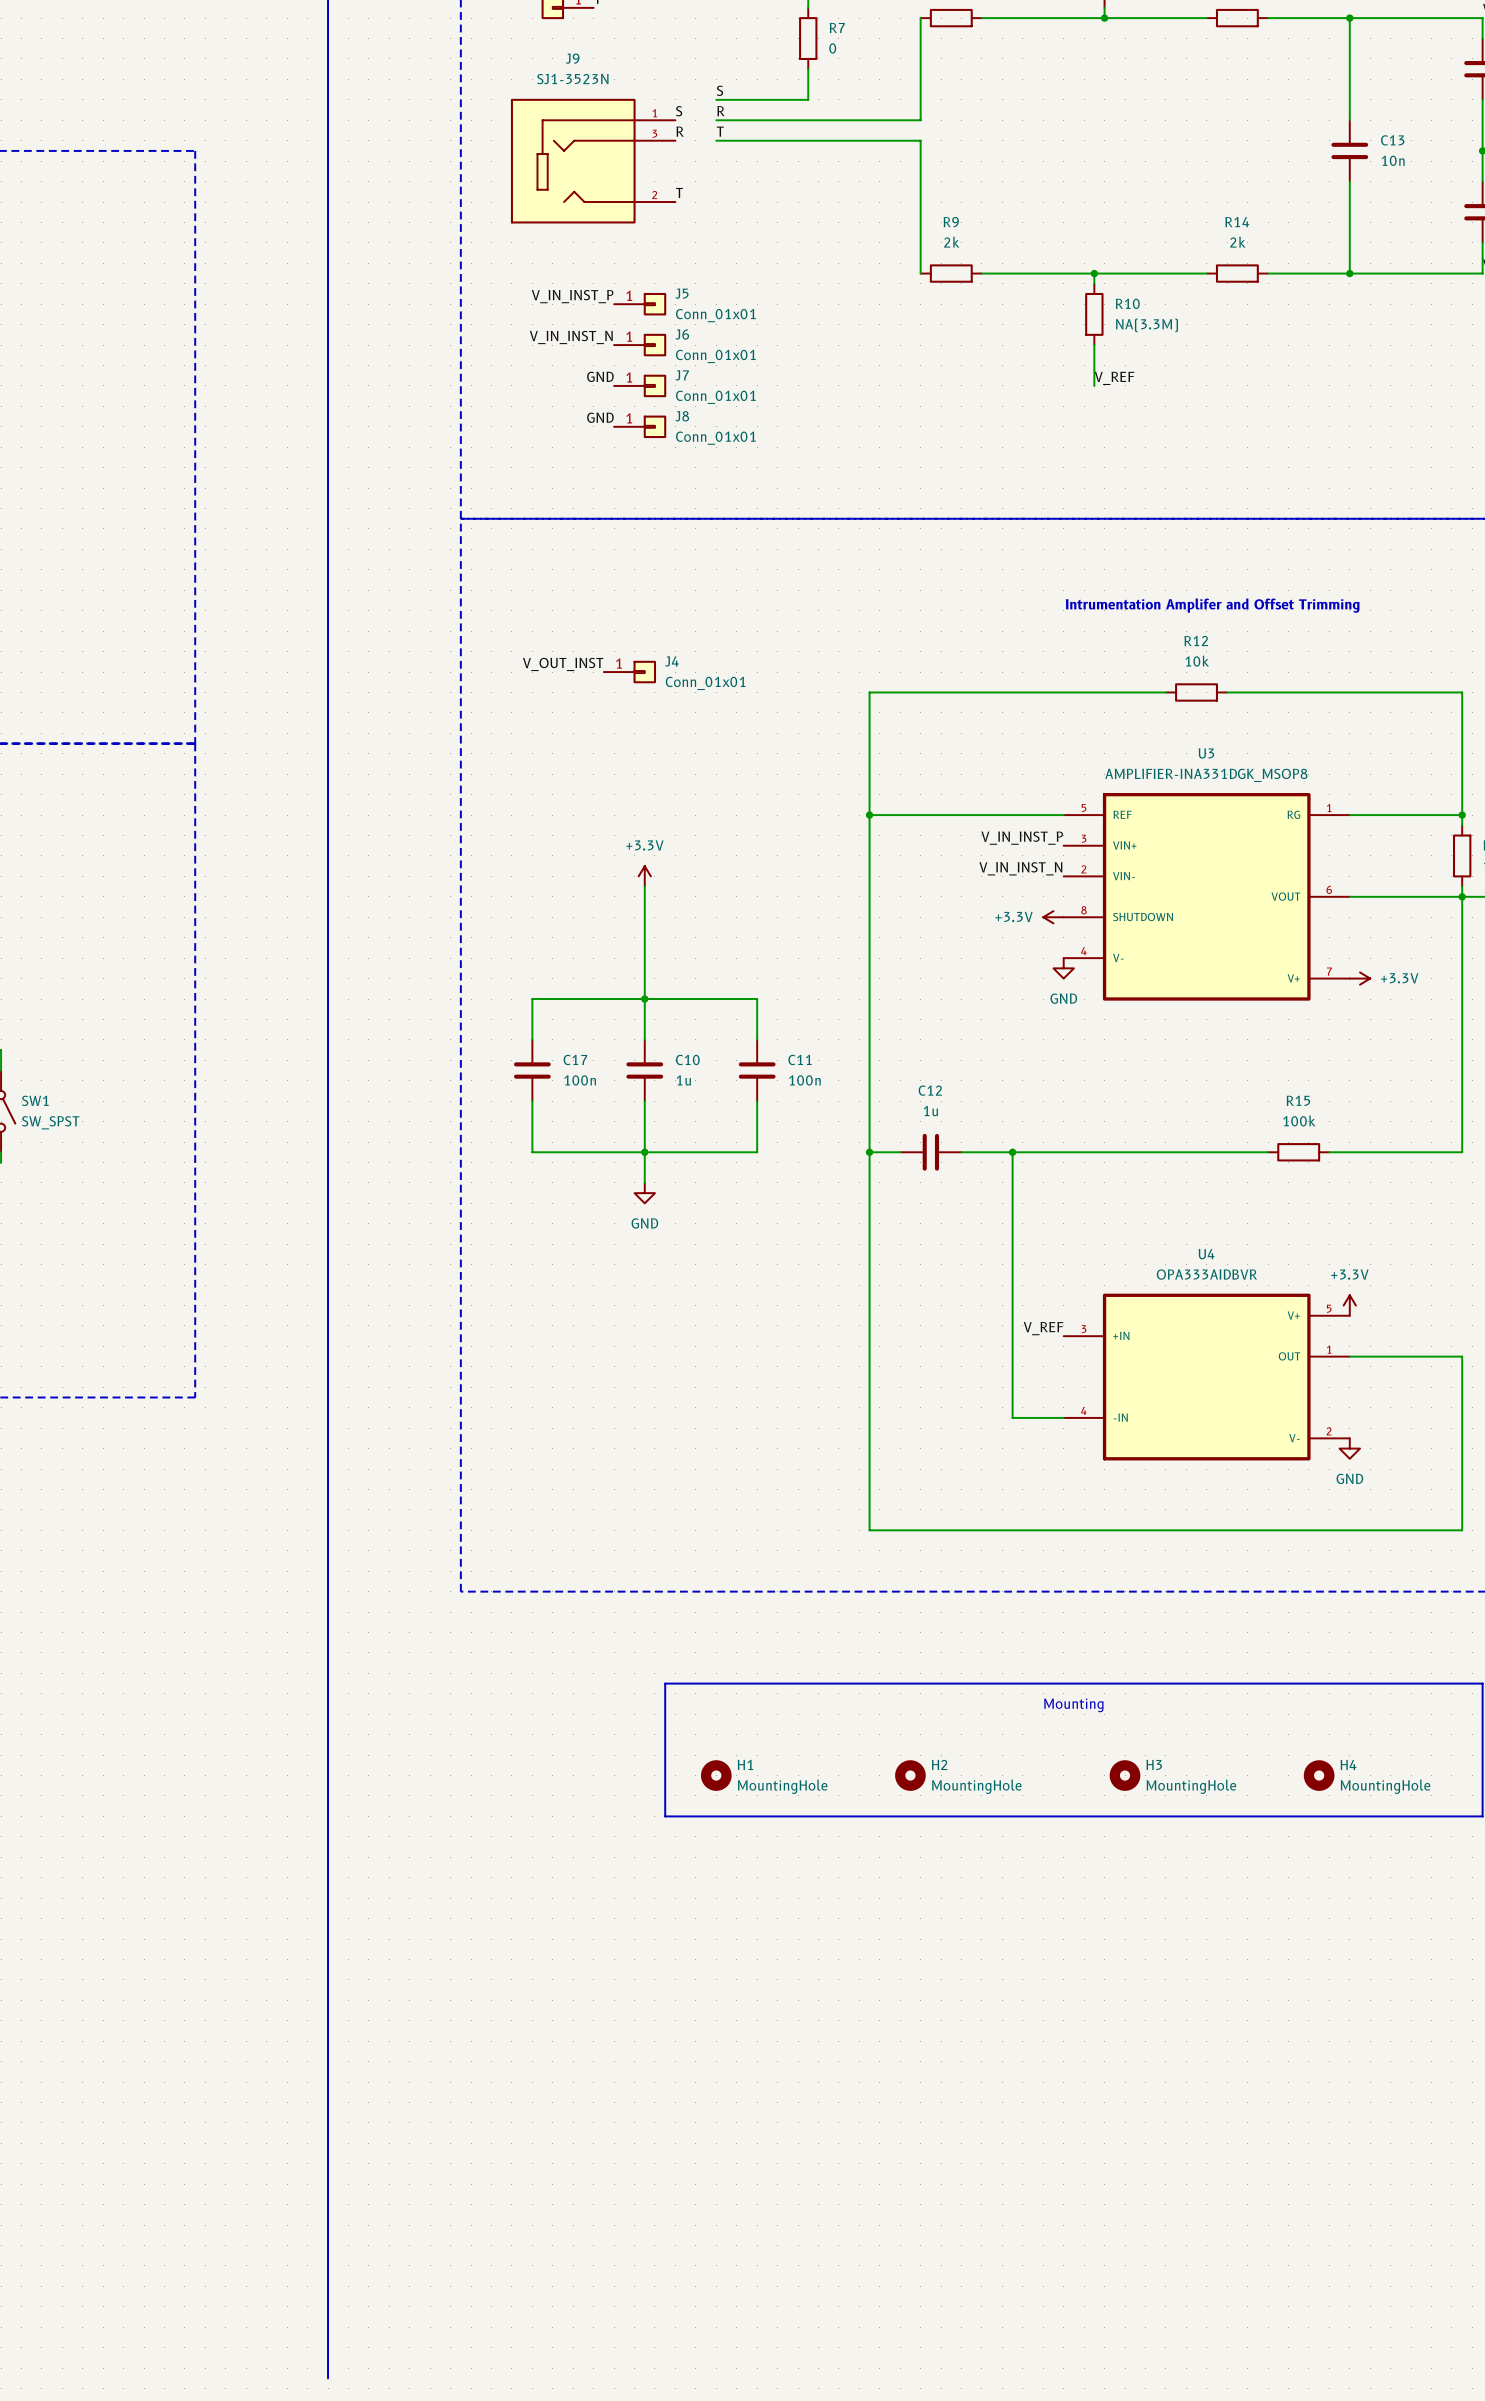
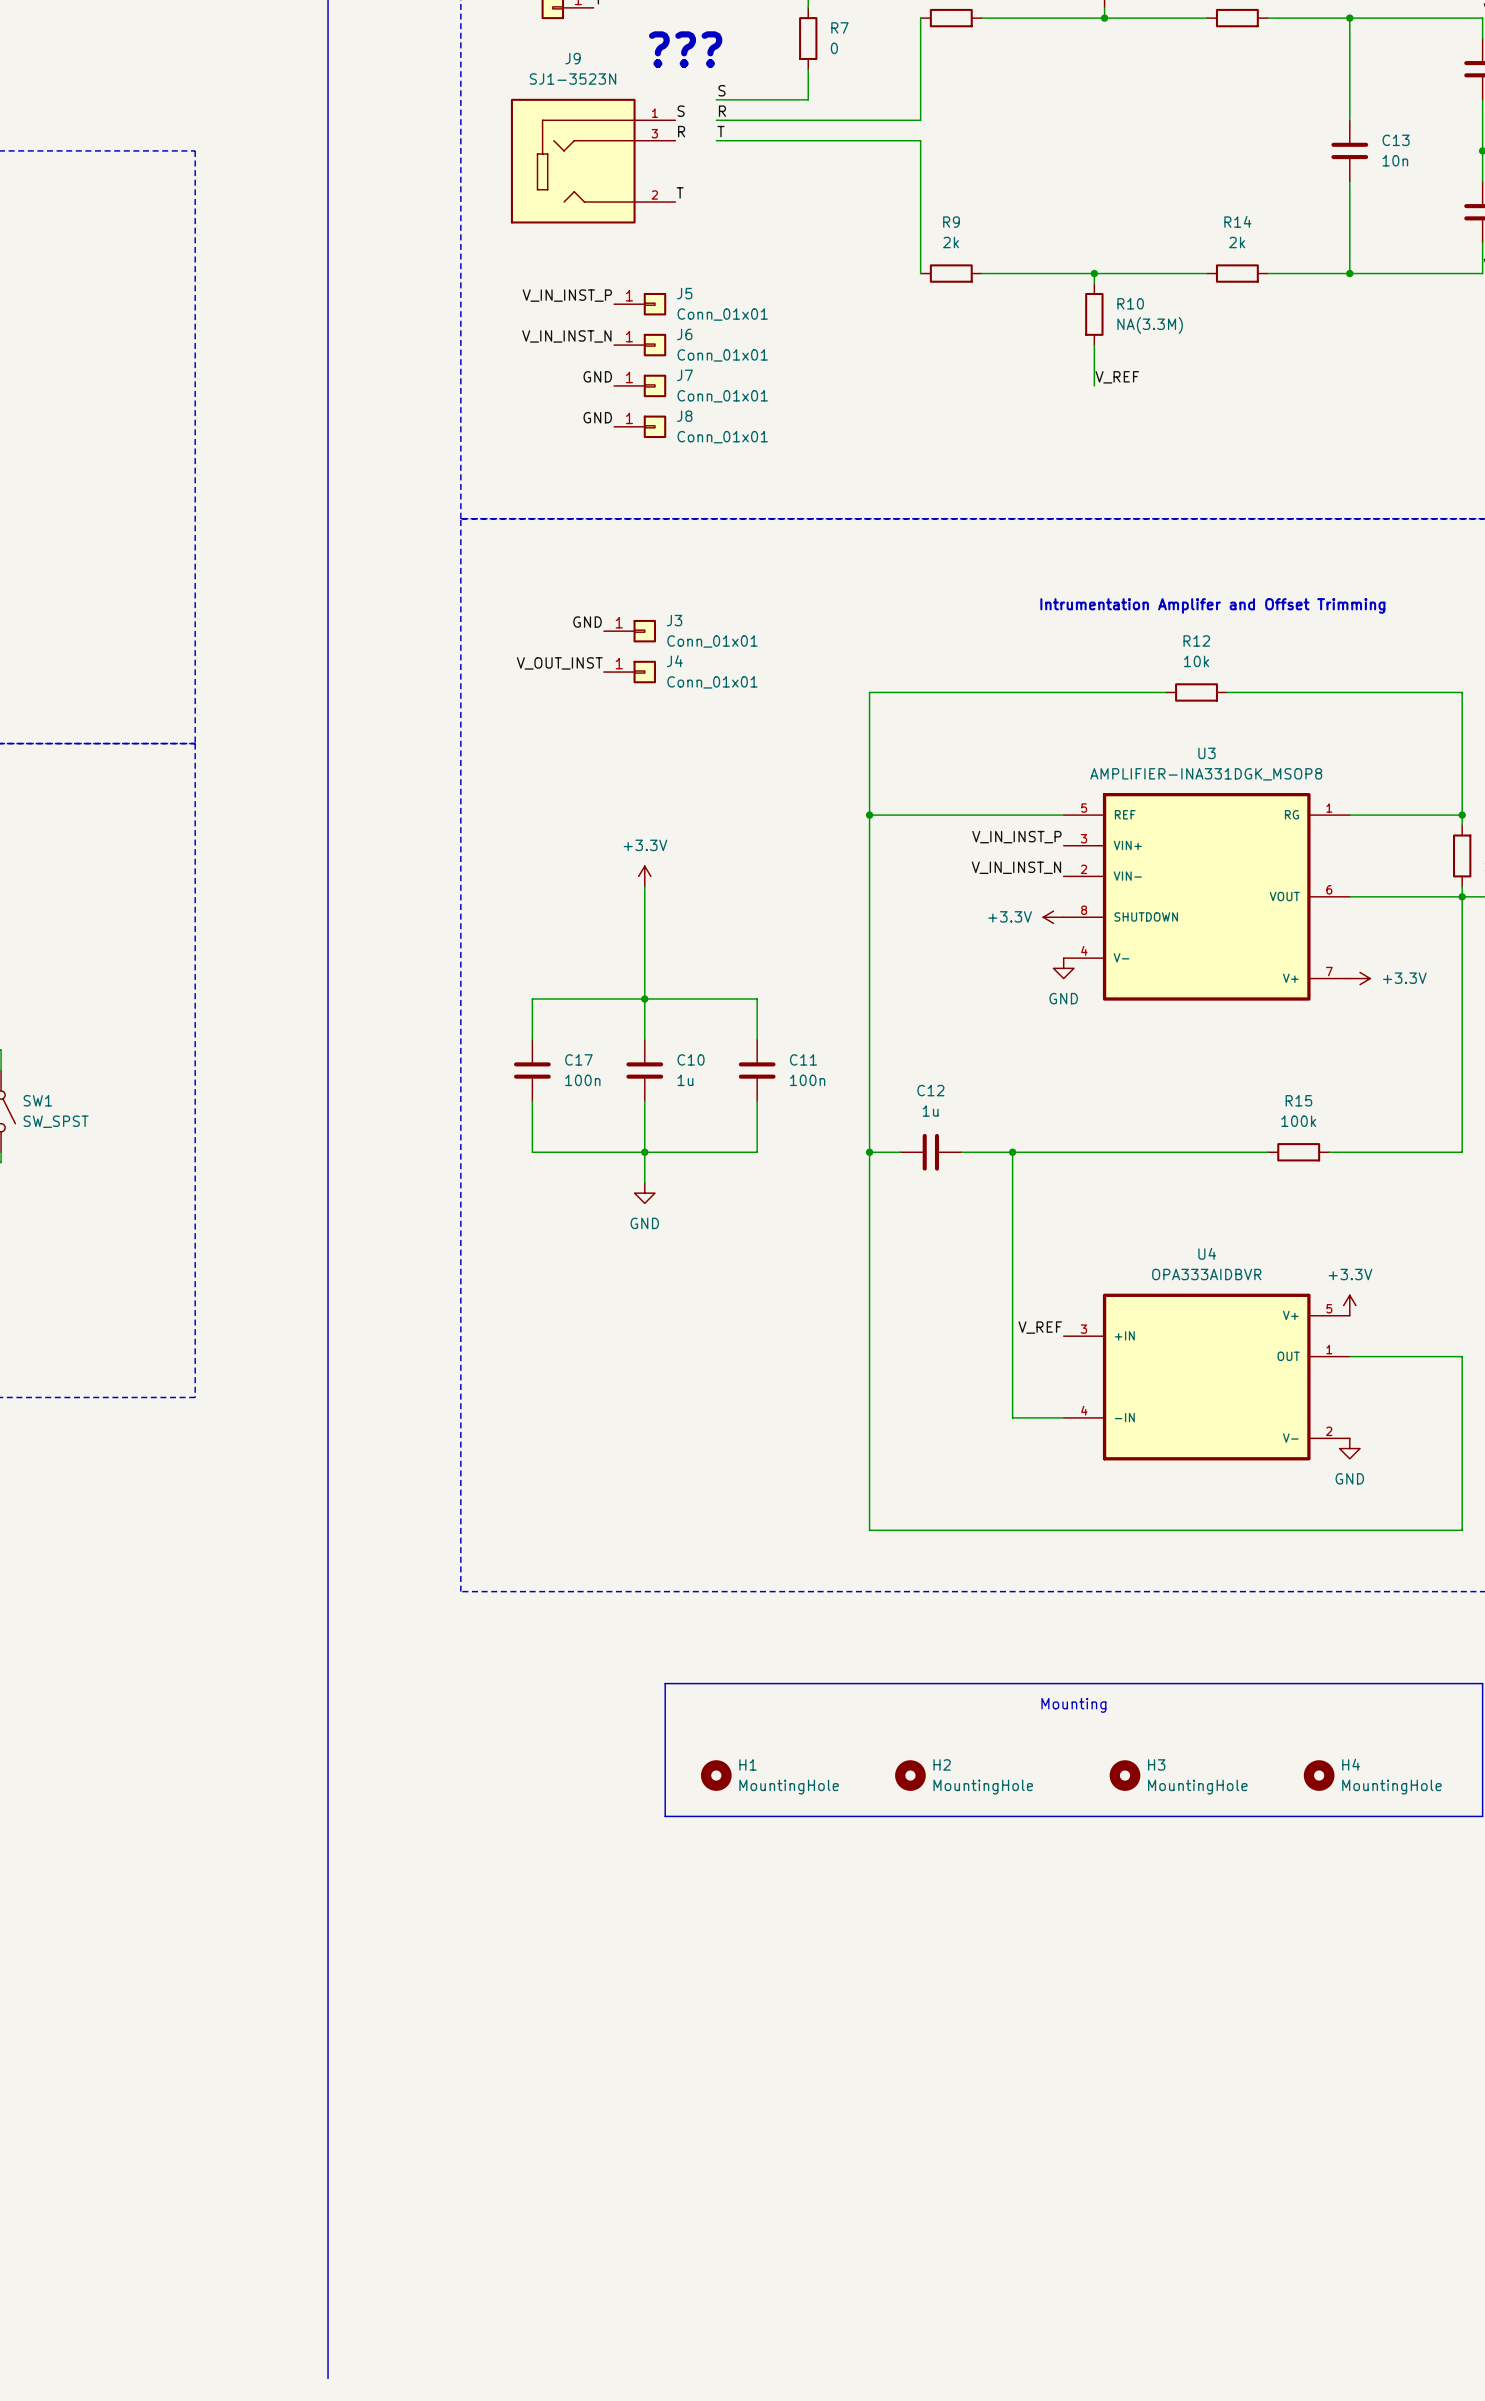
text: none -> ??? (685, 49)
label: none -> GND (587, 622)
J3: none -> Conn_01x01 (629, 631)

